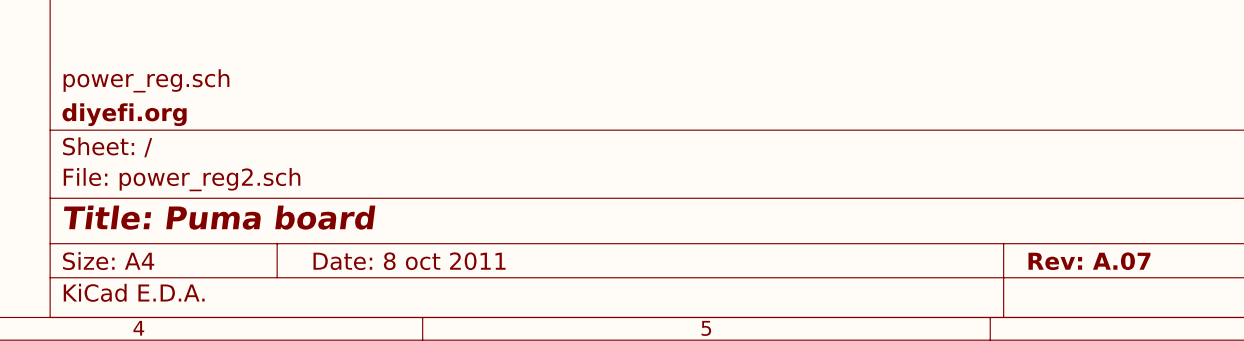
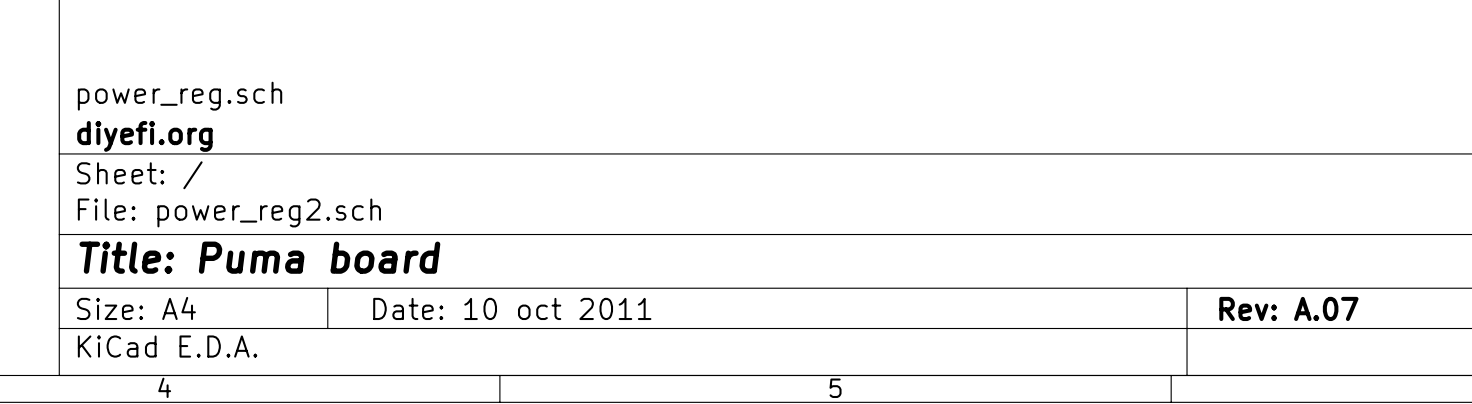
title block: Date: 8 oct 2011 (409, 261) -> Date: 10 oct 2011 (512, 308)

